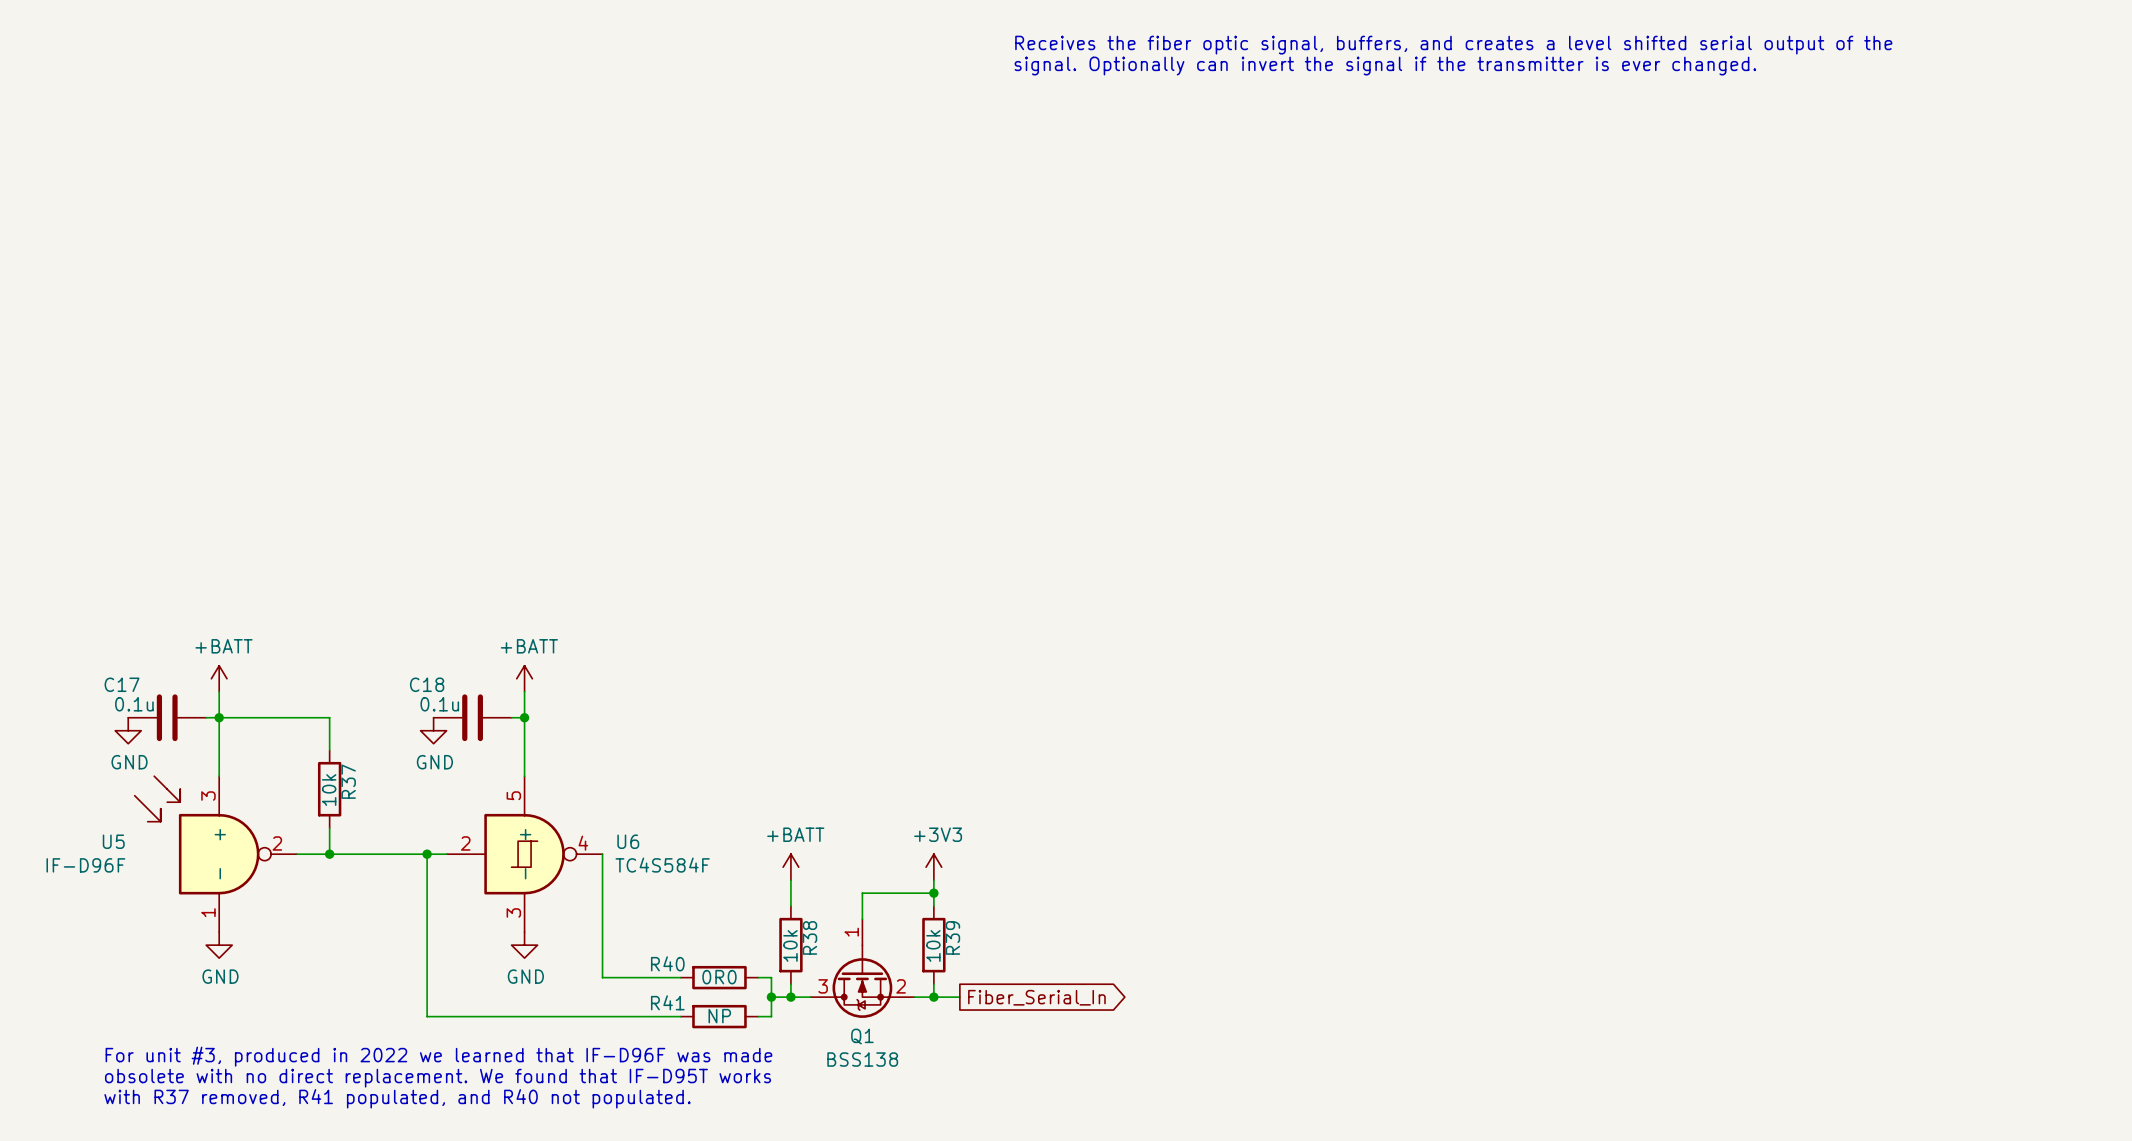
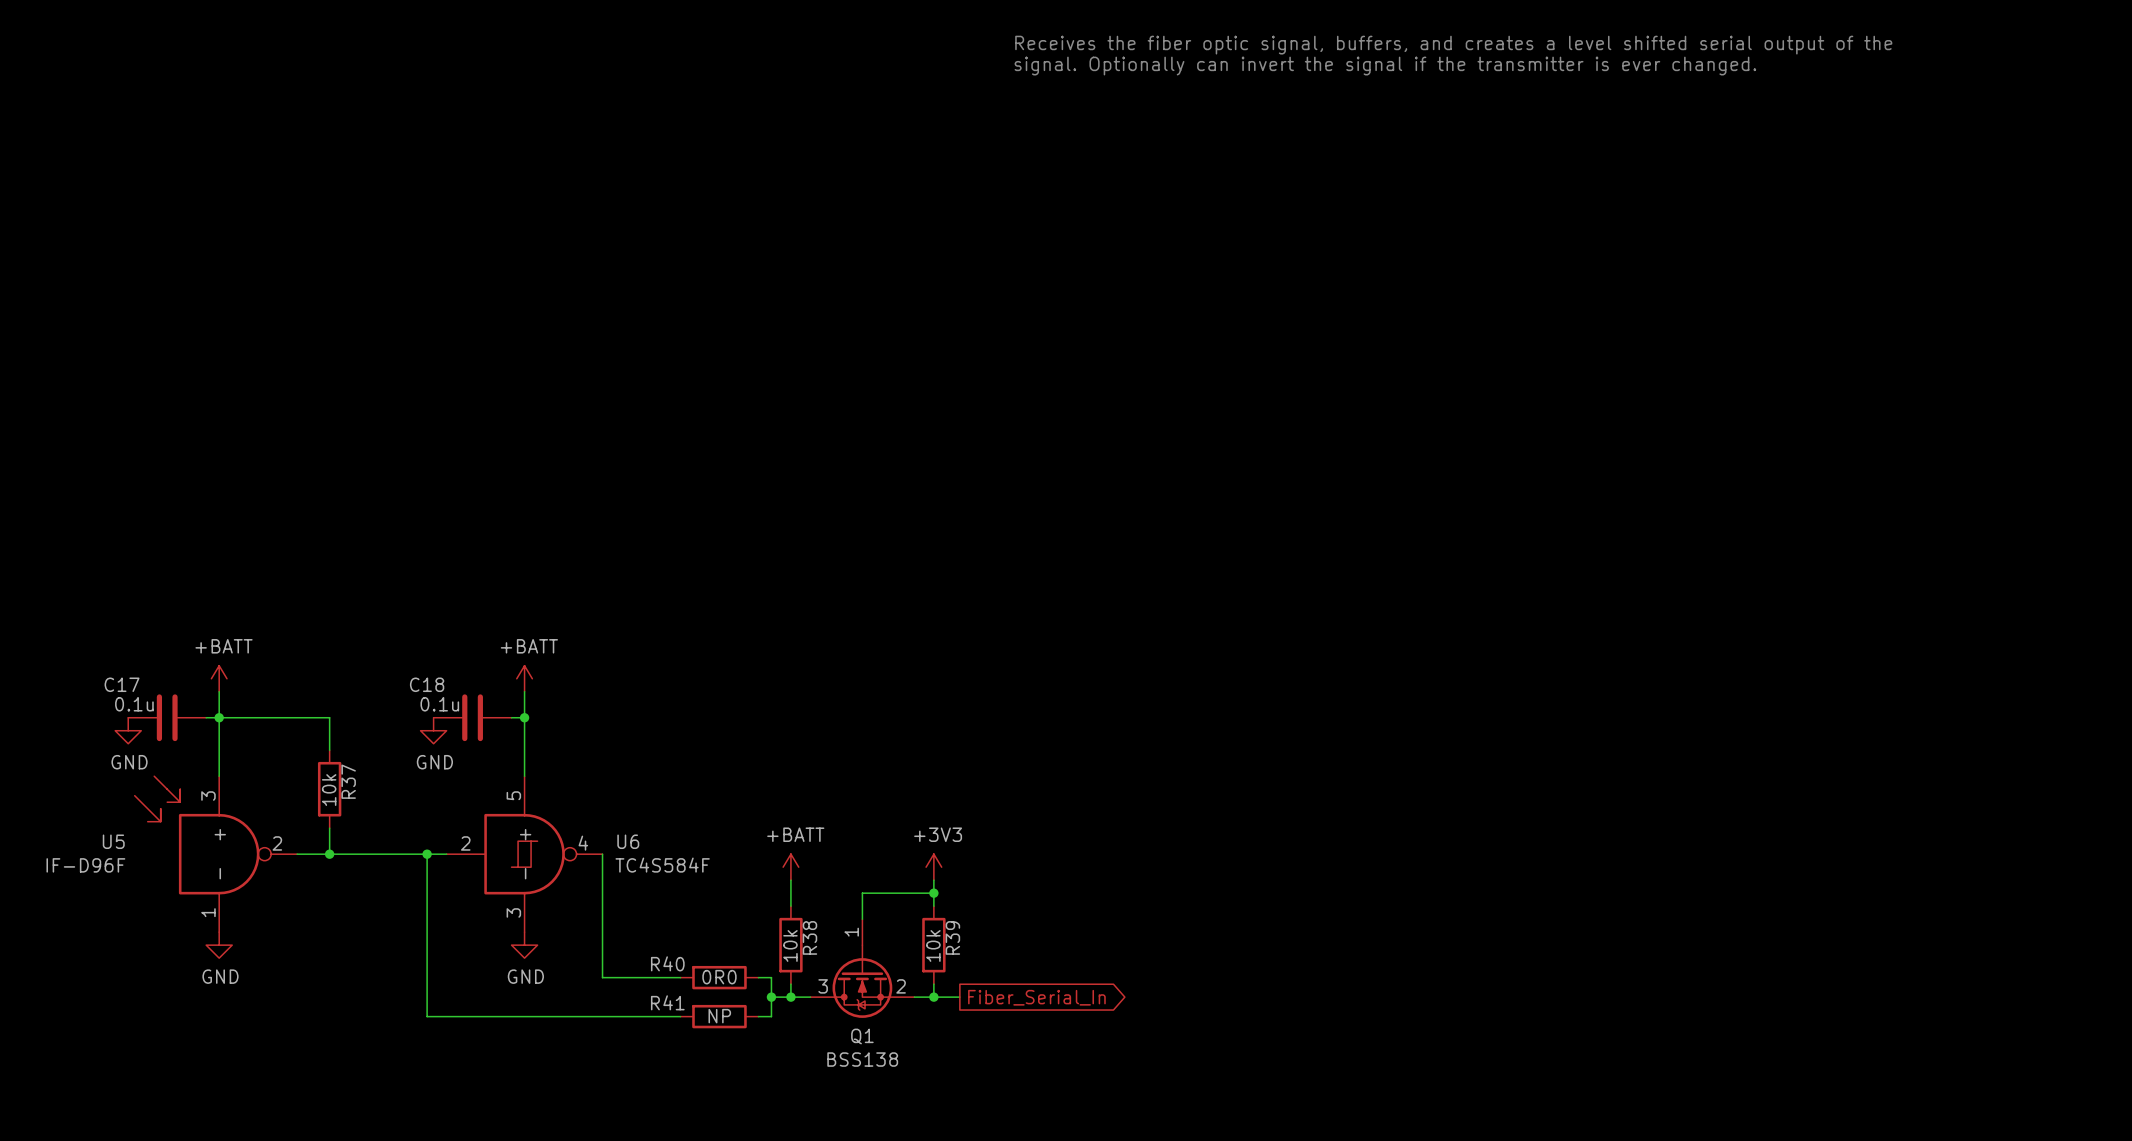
text: For unit #3, produced in 2022 we learned that IF-D96F was made (438, 1056) -> none
text: obsolete with no direct replacement. We found that IF-D95T works (438, 1078) -> none
text: with R37 removed, R41 populated, and R40 not populated. (397, 1098) -> none

